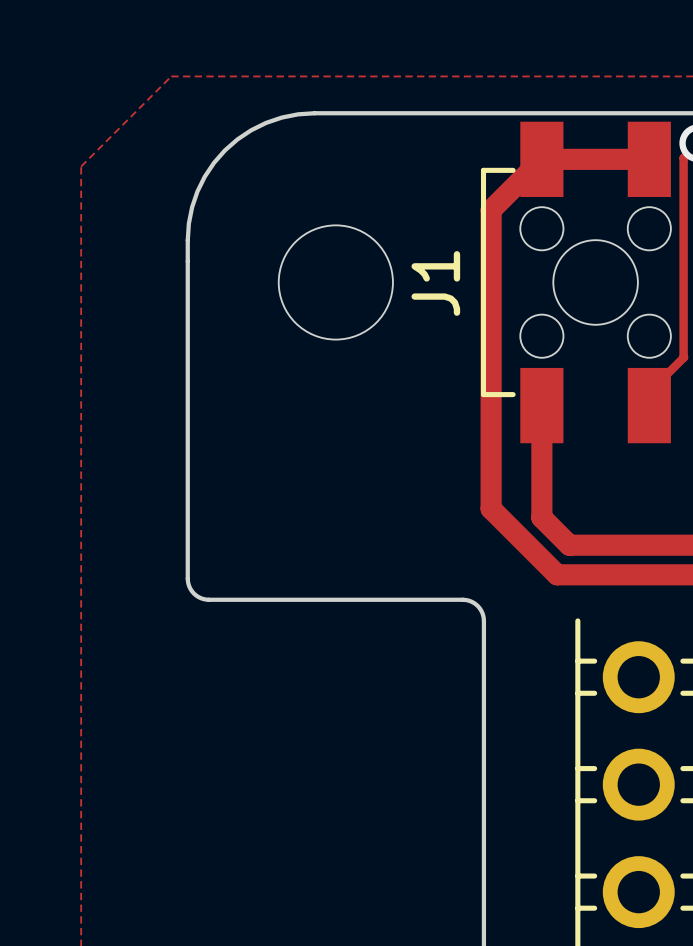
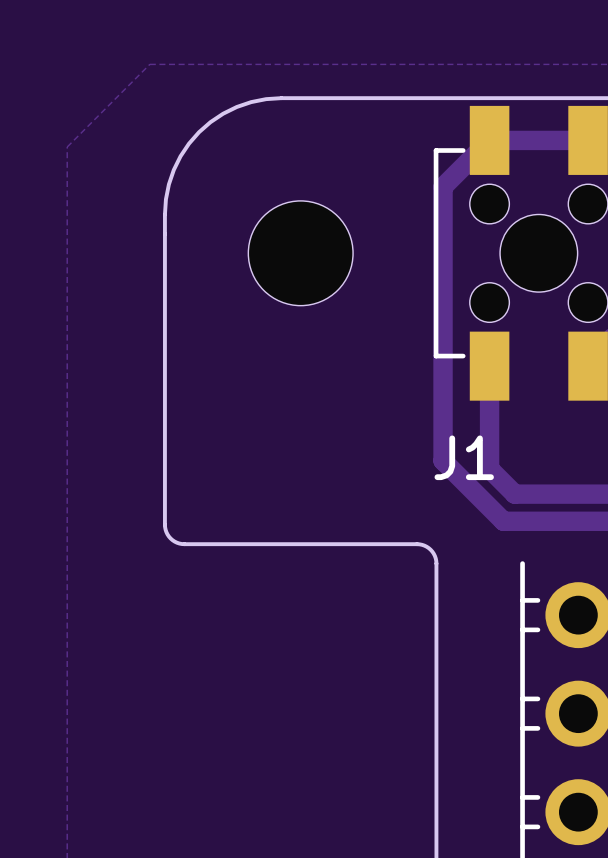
J1 name rotation: 0° (435, 283) -> 90° clockwise (464, 457)
J1 name position: J1 (435, 283) -> J1 (464, 457)

